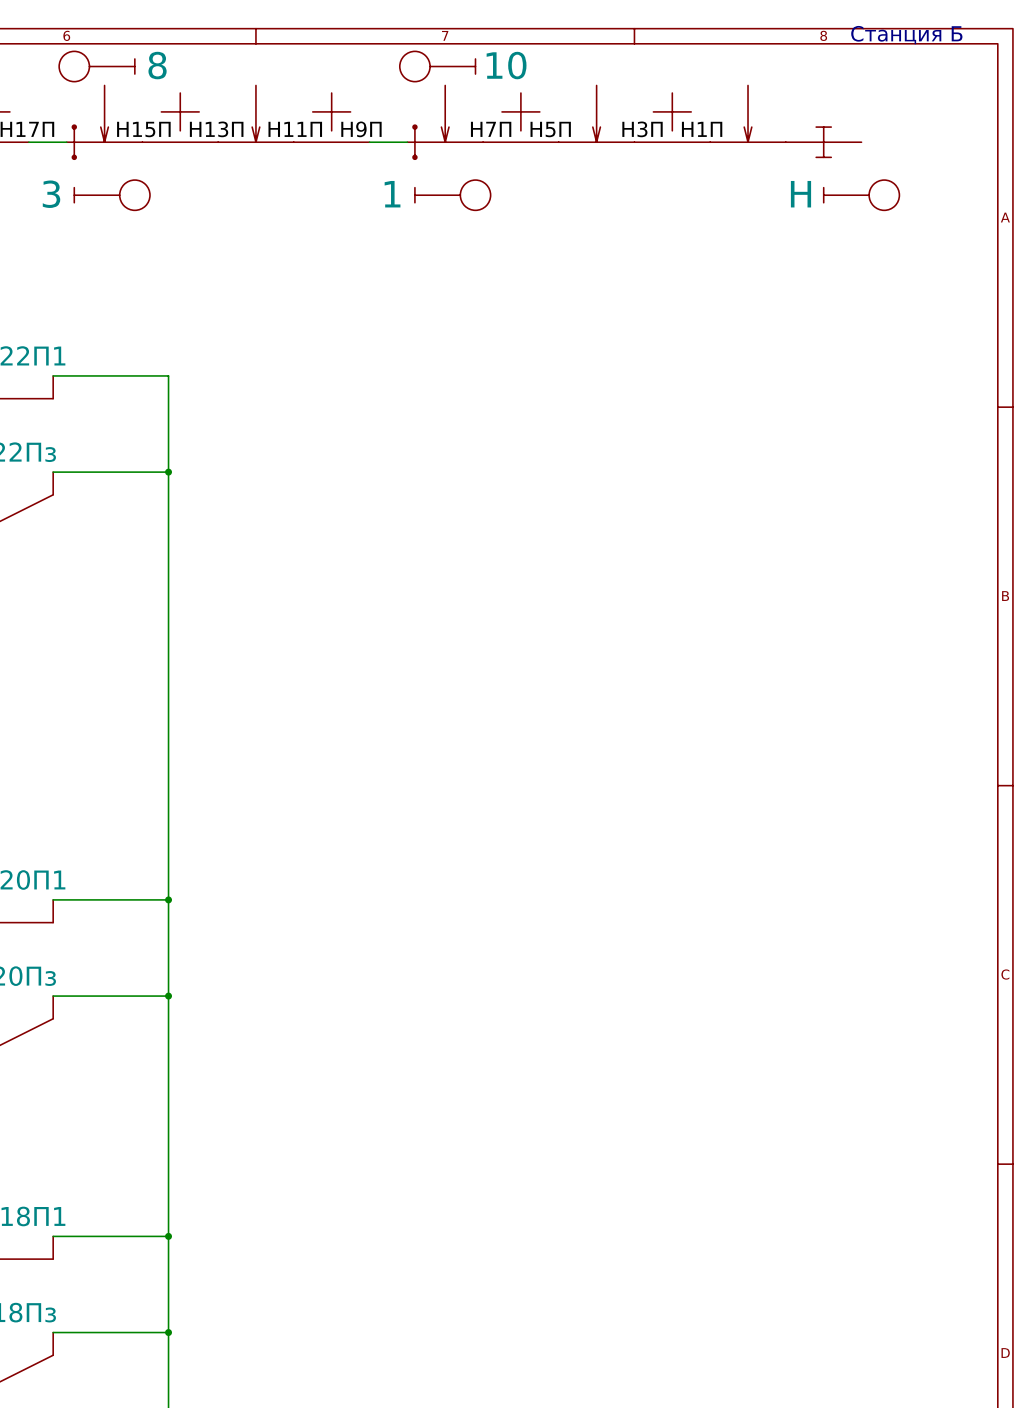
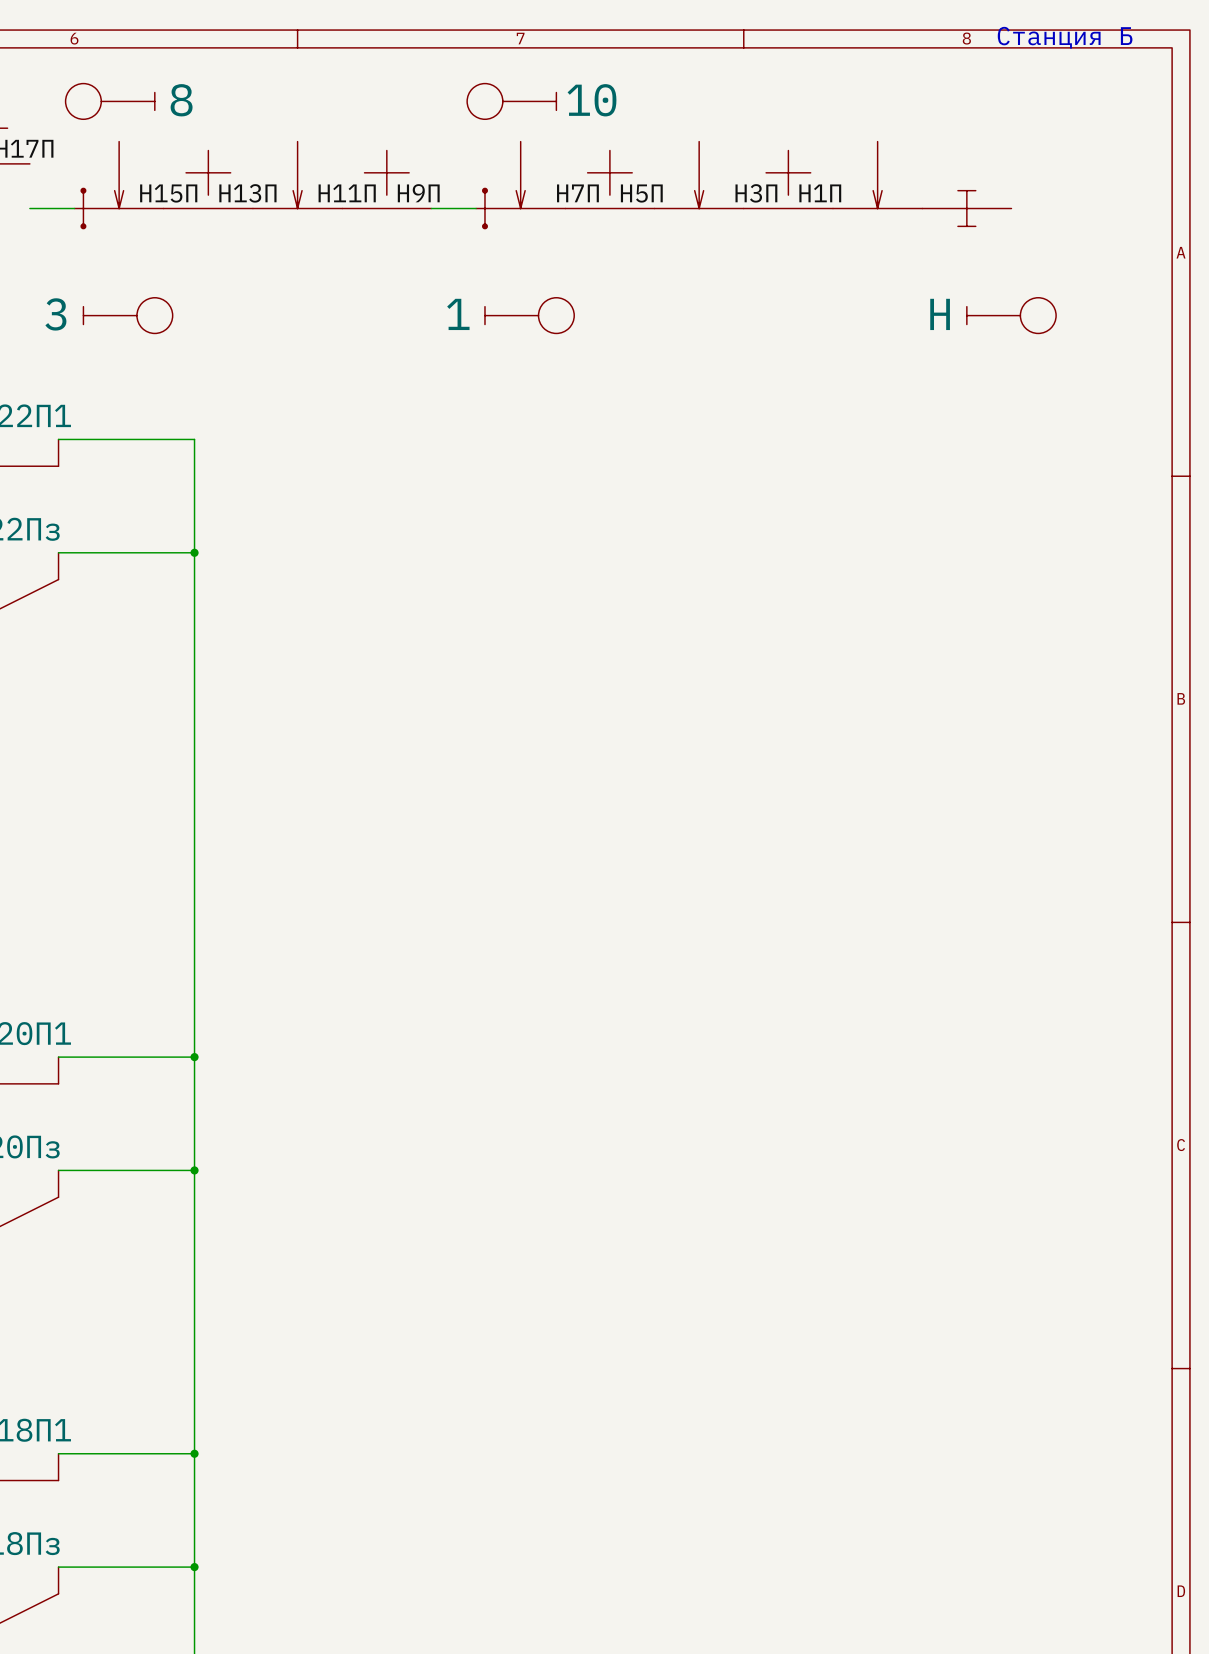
part position: (97, 66) -> (110, 101)
part position: (437, 66) -> (511, 101)
part position: (104, 113) -> (119, 175)
part position: (255, 113) -> (297, 175)
part position: (445, 113) -> (520, 175)
part position: (596, 113) -> (699, 175)
part position: (748, 113) -> (877, 175)
part position: (180, 117) -> (208, 179)
part position: (331, 117) -> (386, 179)
part position: (520, 117) -> (609, 179)
part position: (672, 117) -> (788, 179)
label position: Н15П (143, 129) -> Н15П (168, 193)
label position: Н13П (216, 129) -> Н13П (247, 193)
label position: Н11П (295, 129) -> Н11П (347, 193)
label position: Н9П (361, 129) -> Н9П (418, 193)
label position: Н7П (491, 129) -> Н7П (577, 193)
label position: Н5П (550, 129) -> Н5П (641, 193)
label position: Н3П (642, 129) -> Н3П (756, 193)
label position: Н1П (702, 129) -> Н1П (820, 193)
wire: (28, 142) (66, 142) -> (29, 208) (74, 208)
part position: (74, 142) -> (83, 208)
wire: (369, 142) (407, 142) -> (431, 208) (476, 208)
part position: (414, 142) -> (484, 208)
part position: (823, 142) -> (966, 208)
part position: (112, 195) -> (128, 315)
part position: (452, 195) -> (529, 315)
part position: (861, 195) -> (1011, 315)

